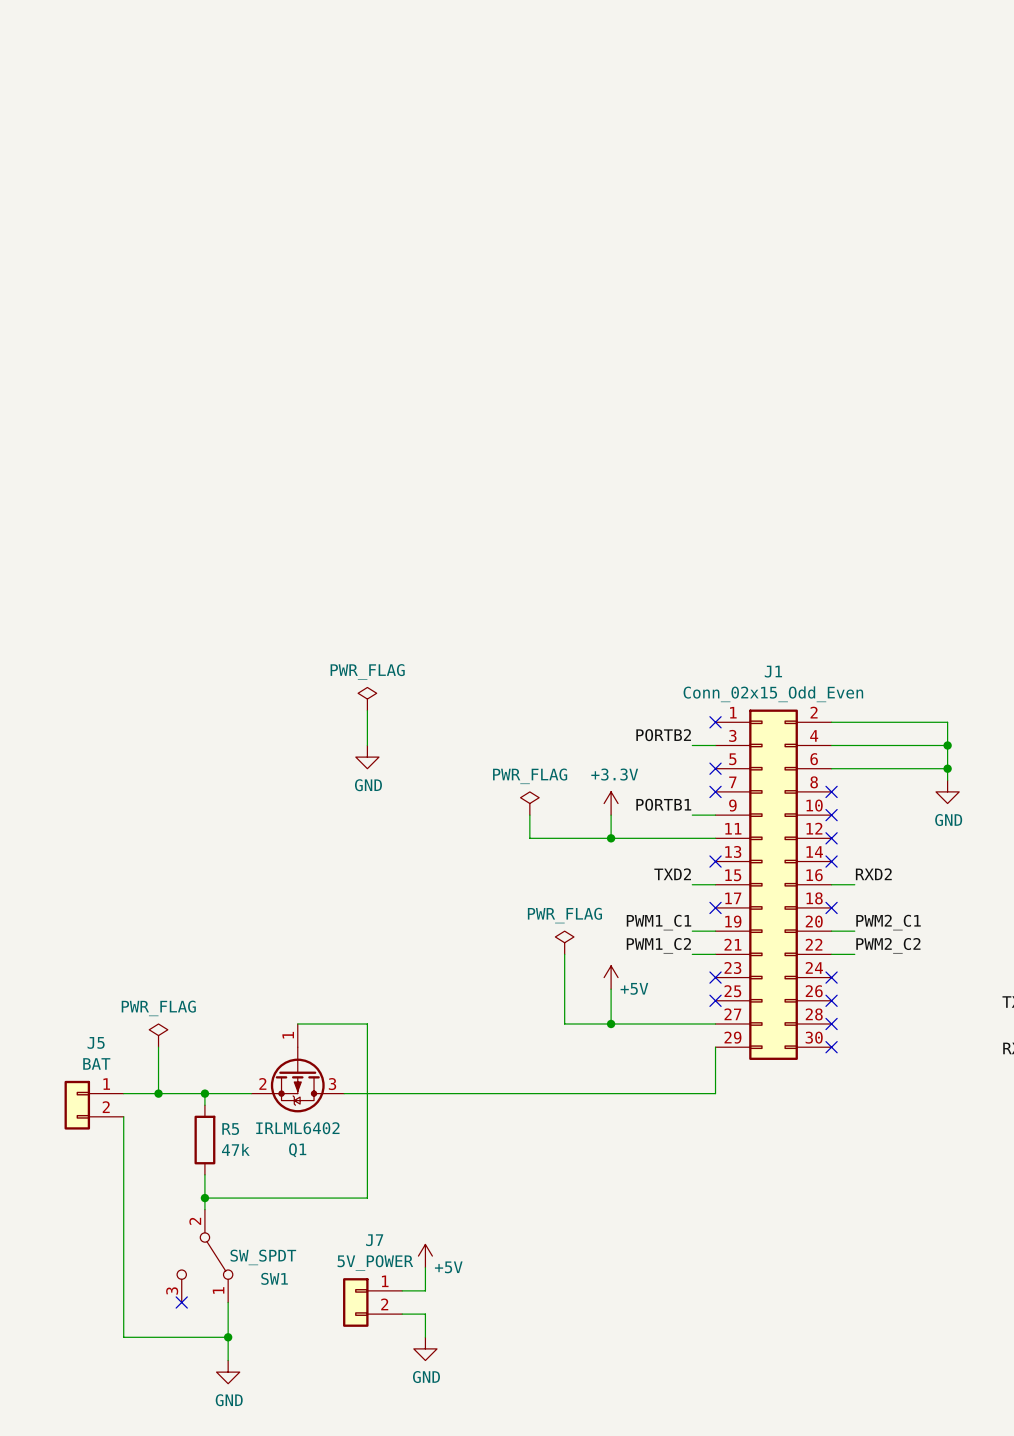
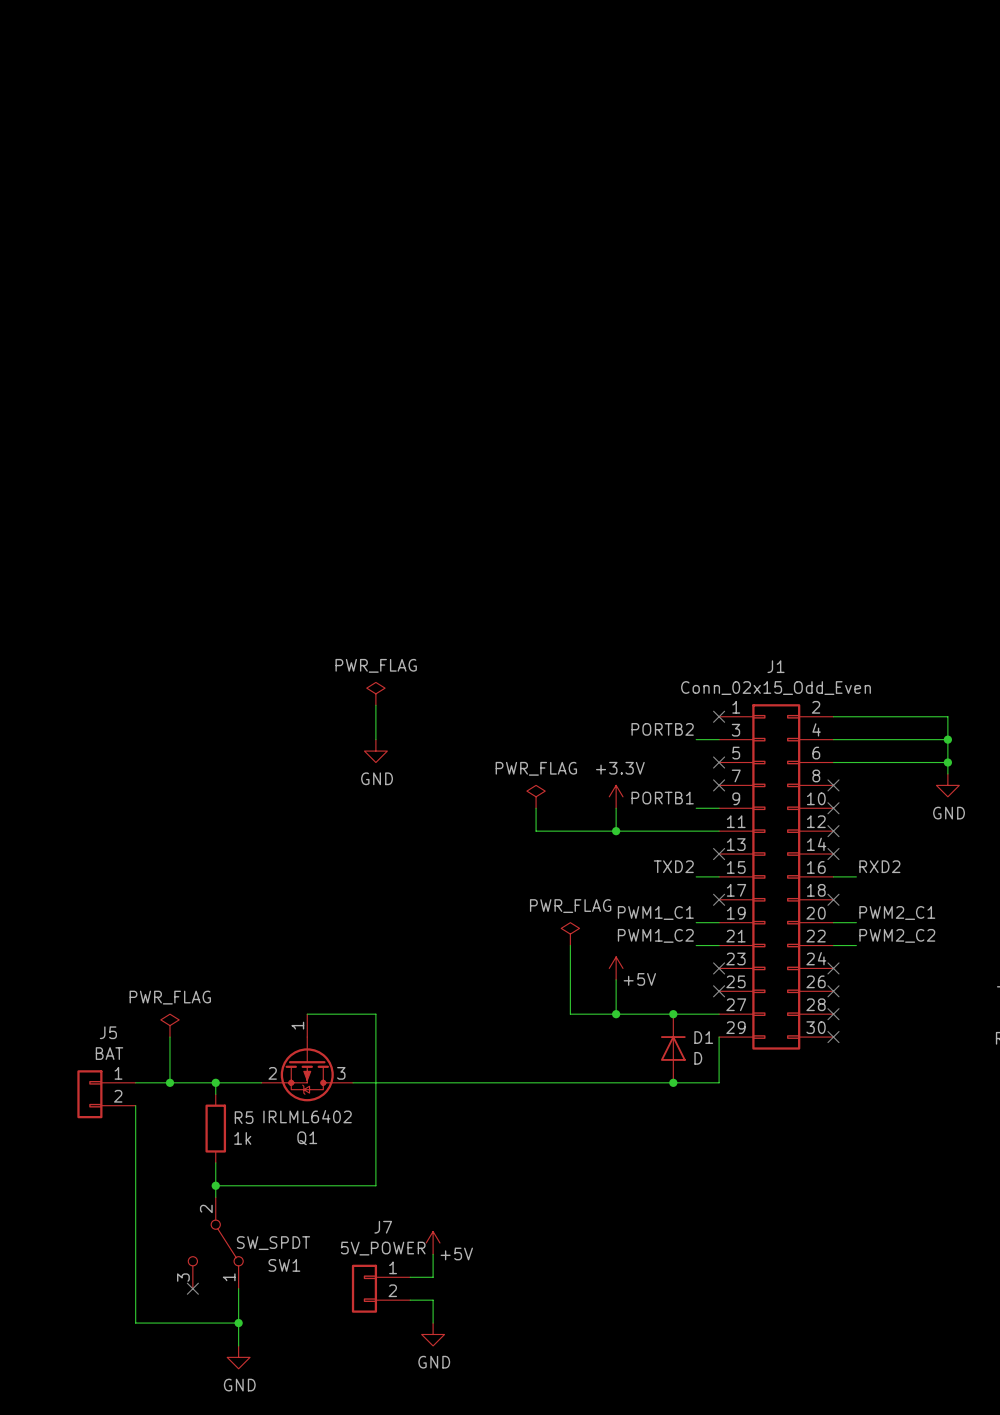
junction: none -> (673, 1014)
D1: none -> D (673, 1048)
junction: none -> (673, 1082)
R5 value: 47k (235, 1149) -> 1k (242, 1138)

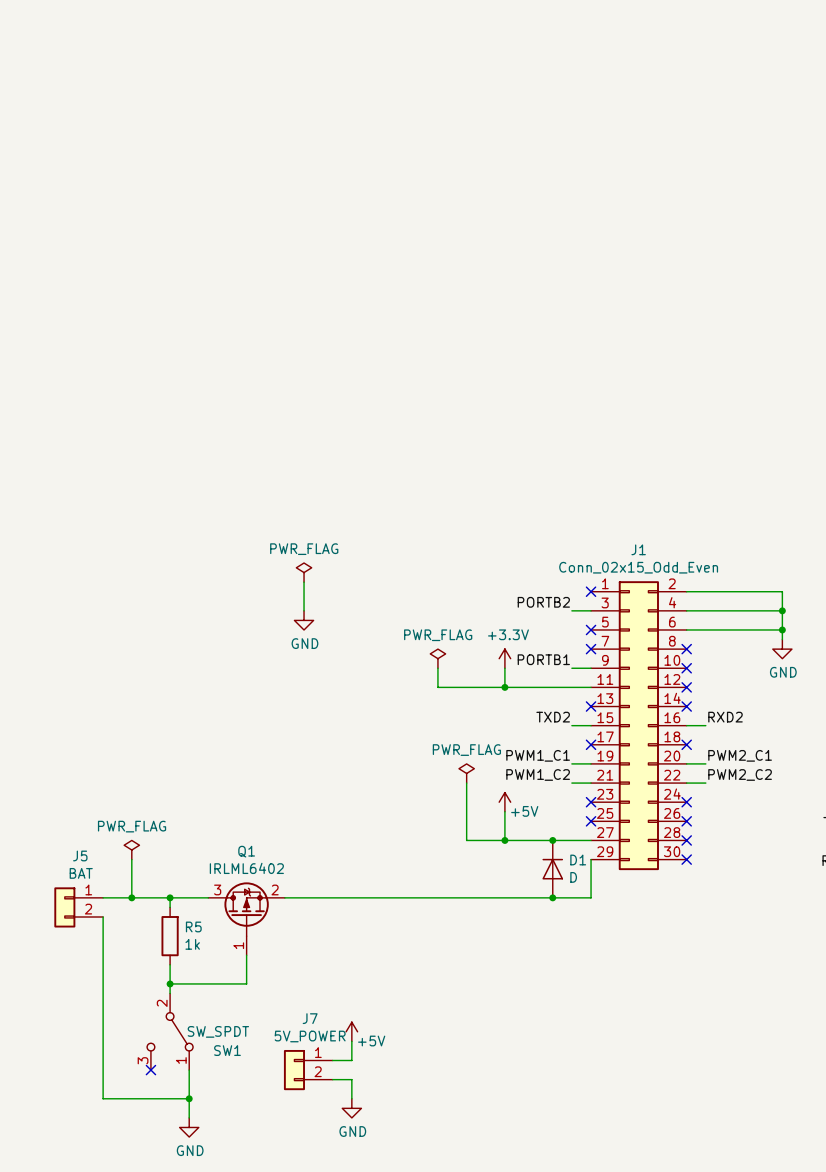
wire: (307, 1014) (375, 1014) (375, 1185) (307, 1185) -> (246, 955) (246, 983)
Q1 rotation: 0° (307, 1069) -> 180° (246, 909)

